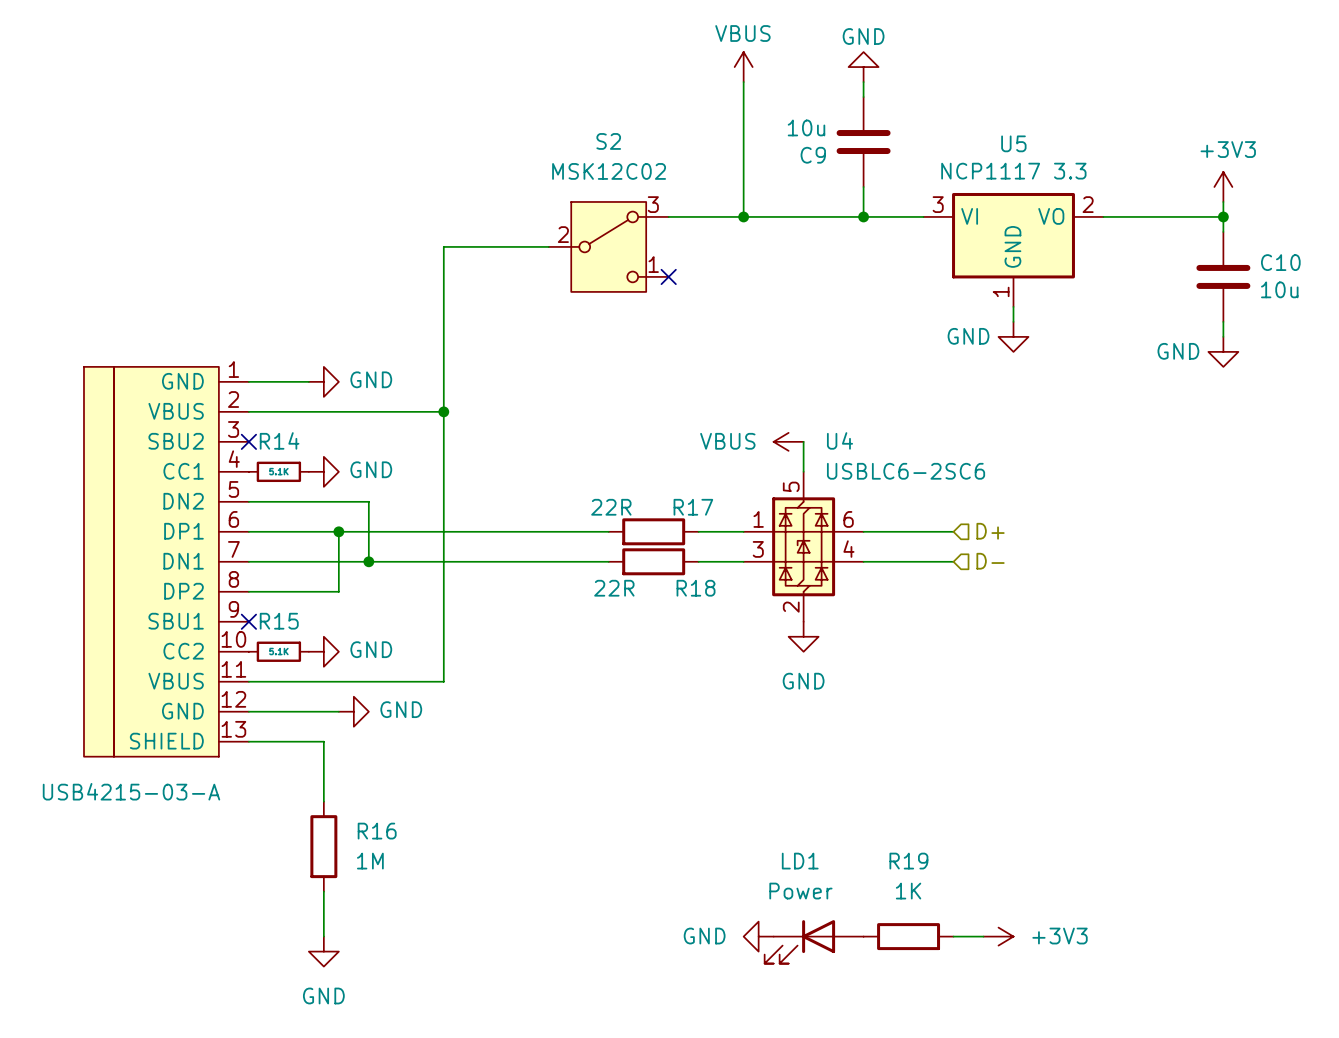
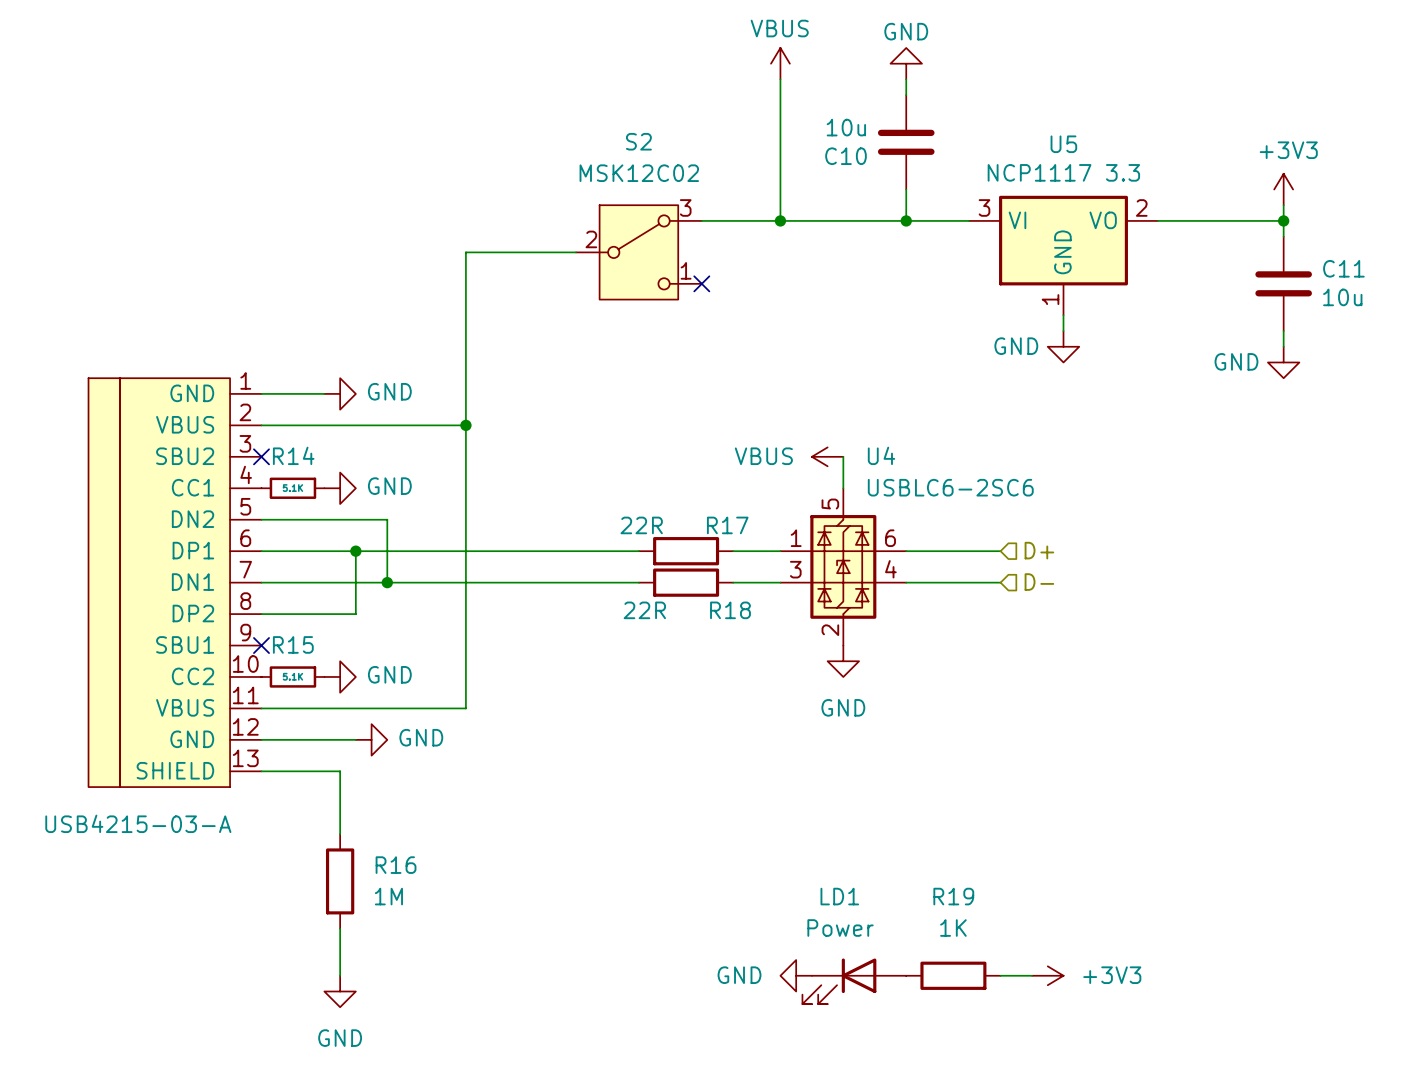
C9 name: C9 (813, 155) -> C10 (845, 156)
C10 name: C10 (1280, 262) -> C11 (1343, 268)

